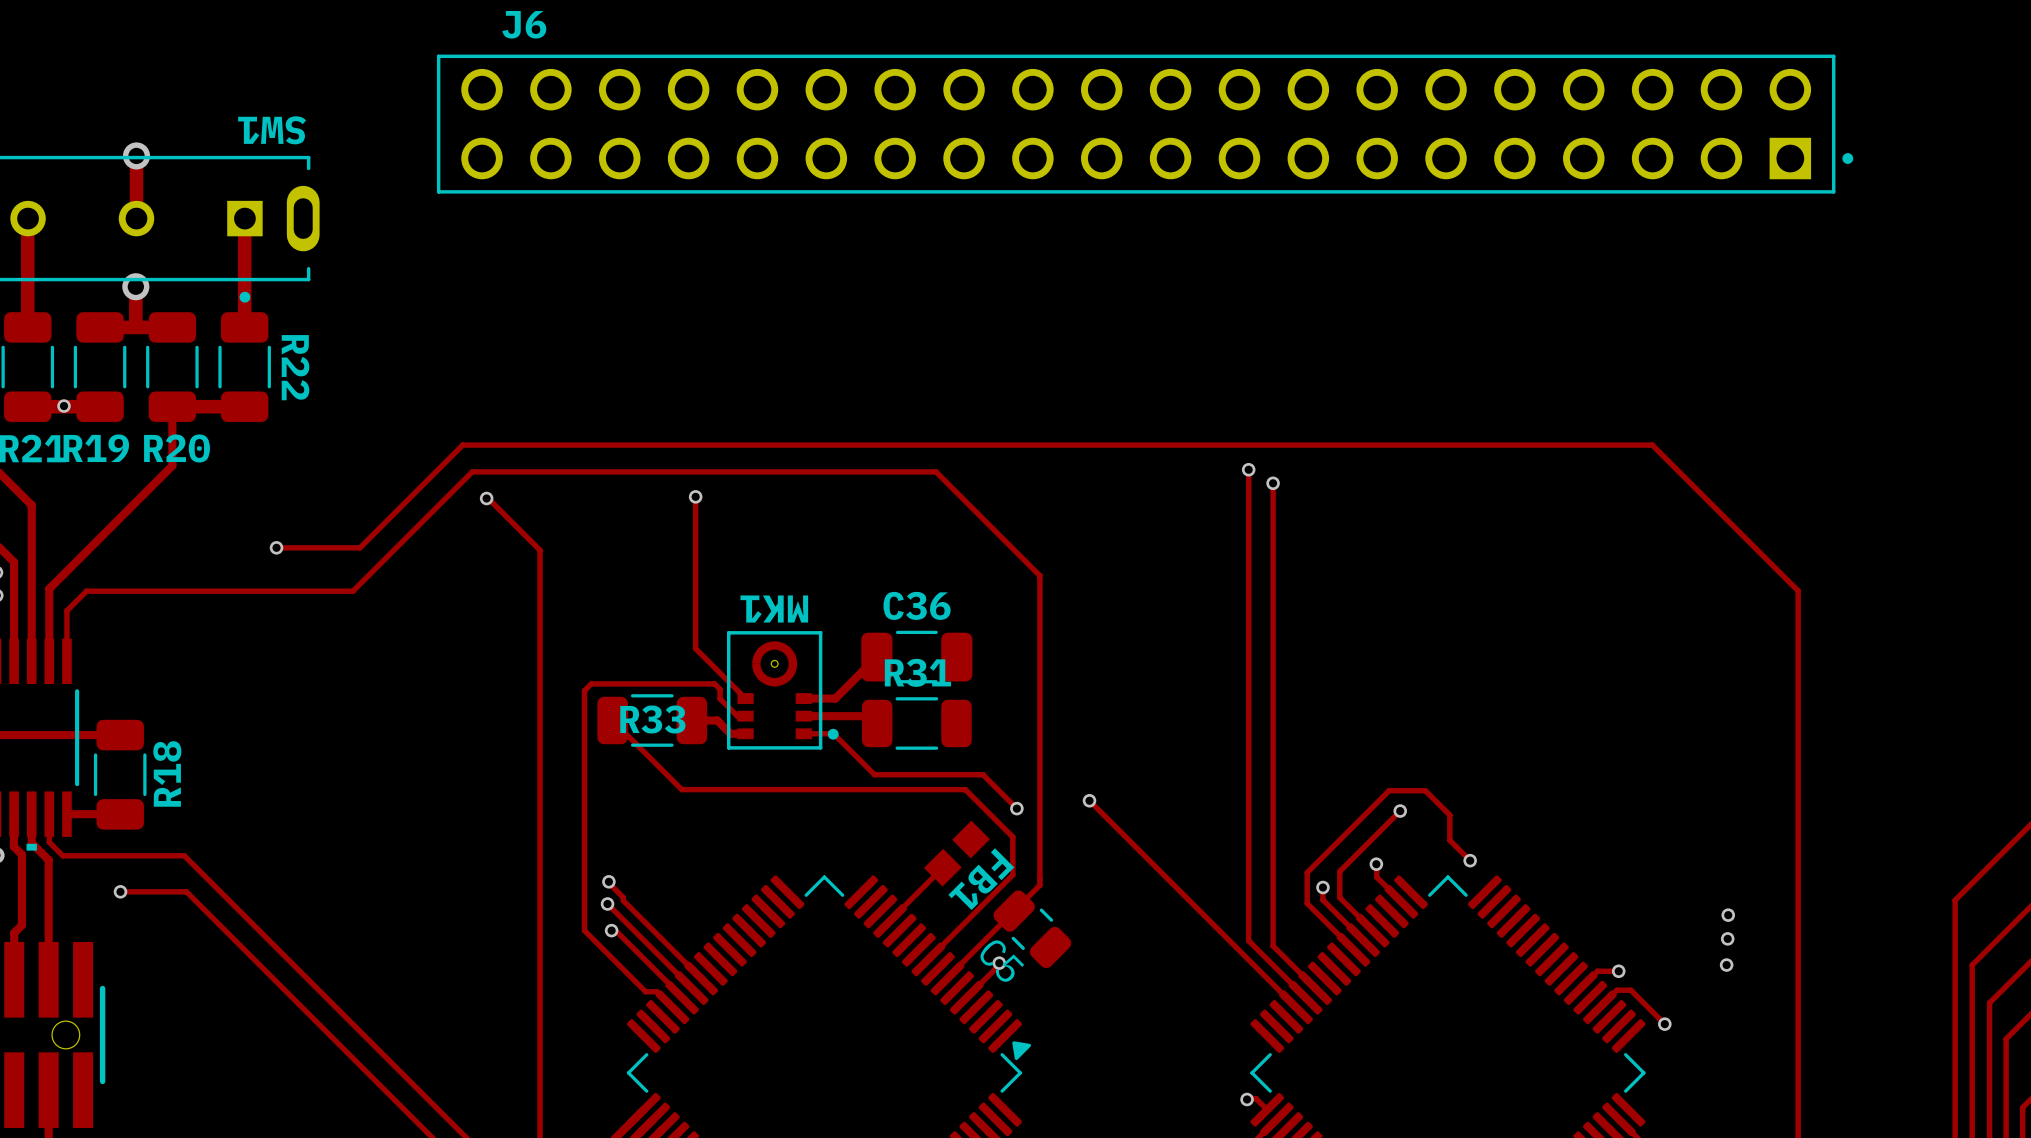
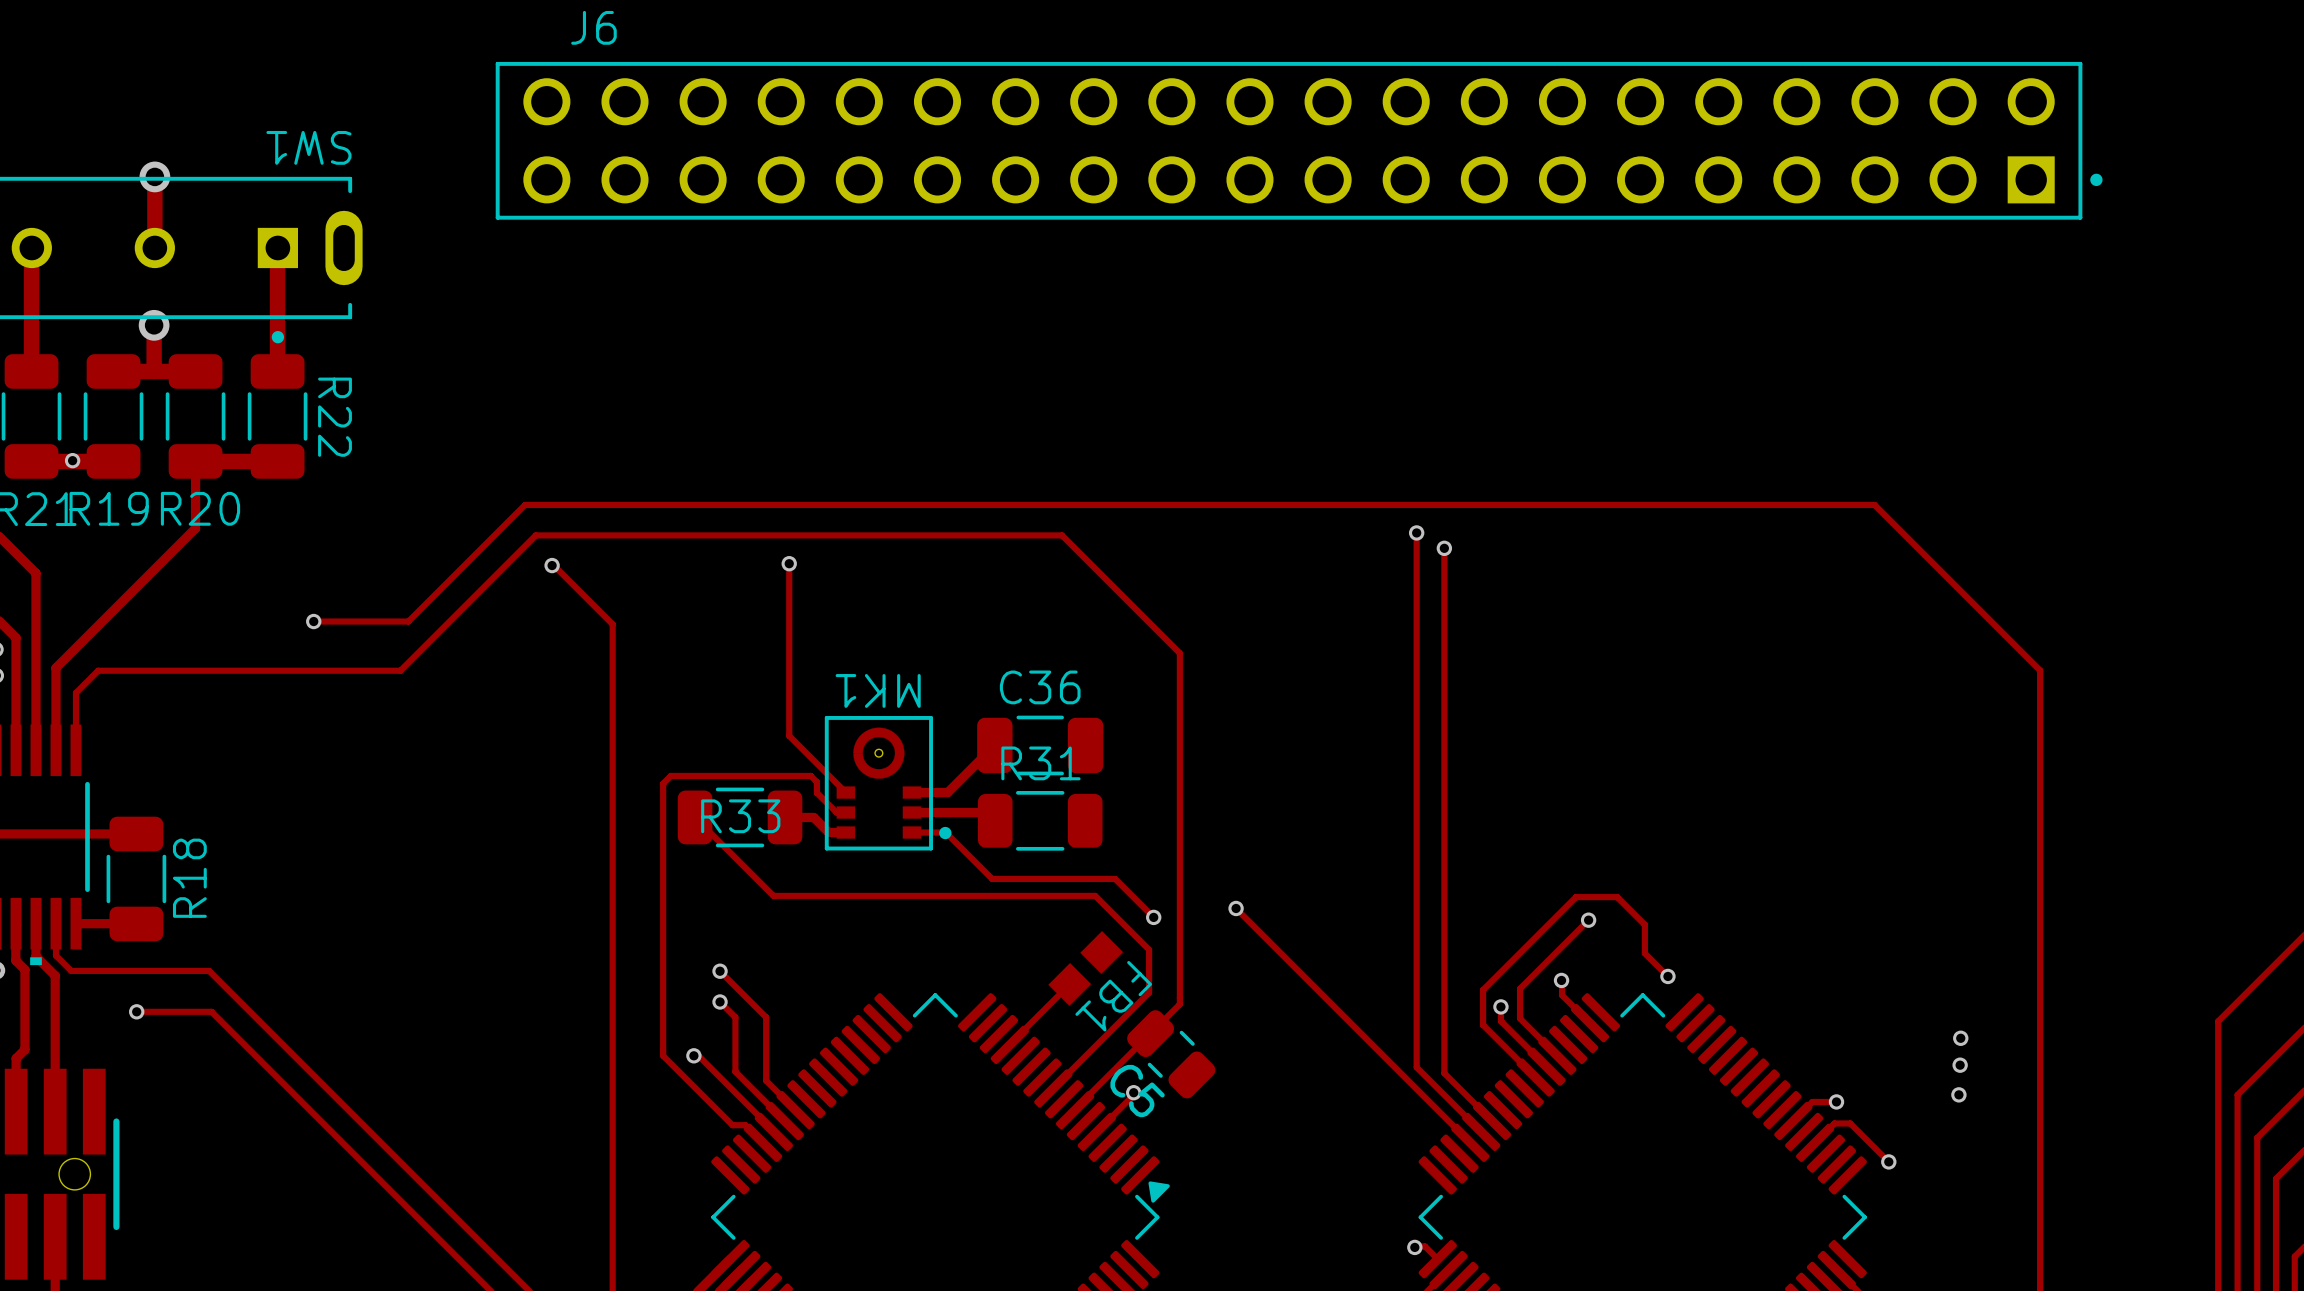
via: none -> (720, 971)
track: (608, 881) (623, 897) (623, 900) (675, 952) -> (720, 971) (766, 1017) (766, 1080)
via: (608, 881) -> none
via: none -> (720, 1001)
track: (607, 903) (648, 944) -> (720, 1001) (735, 1017) (735, 1071)
via: (607, 903) -> none

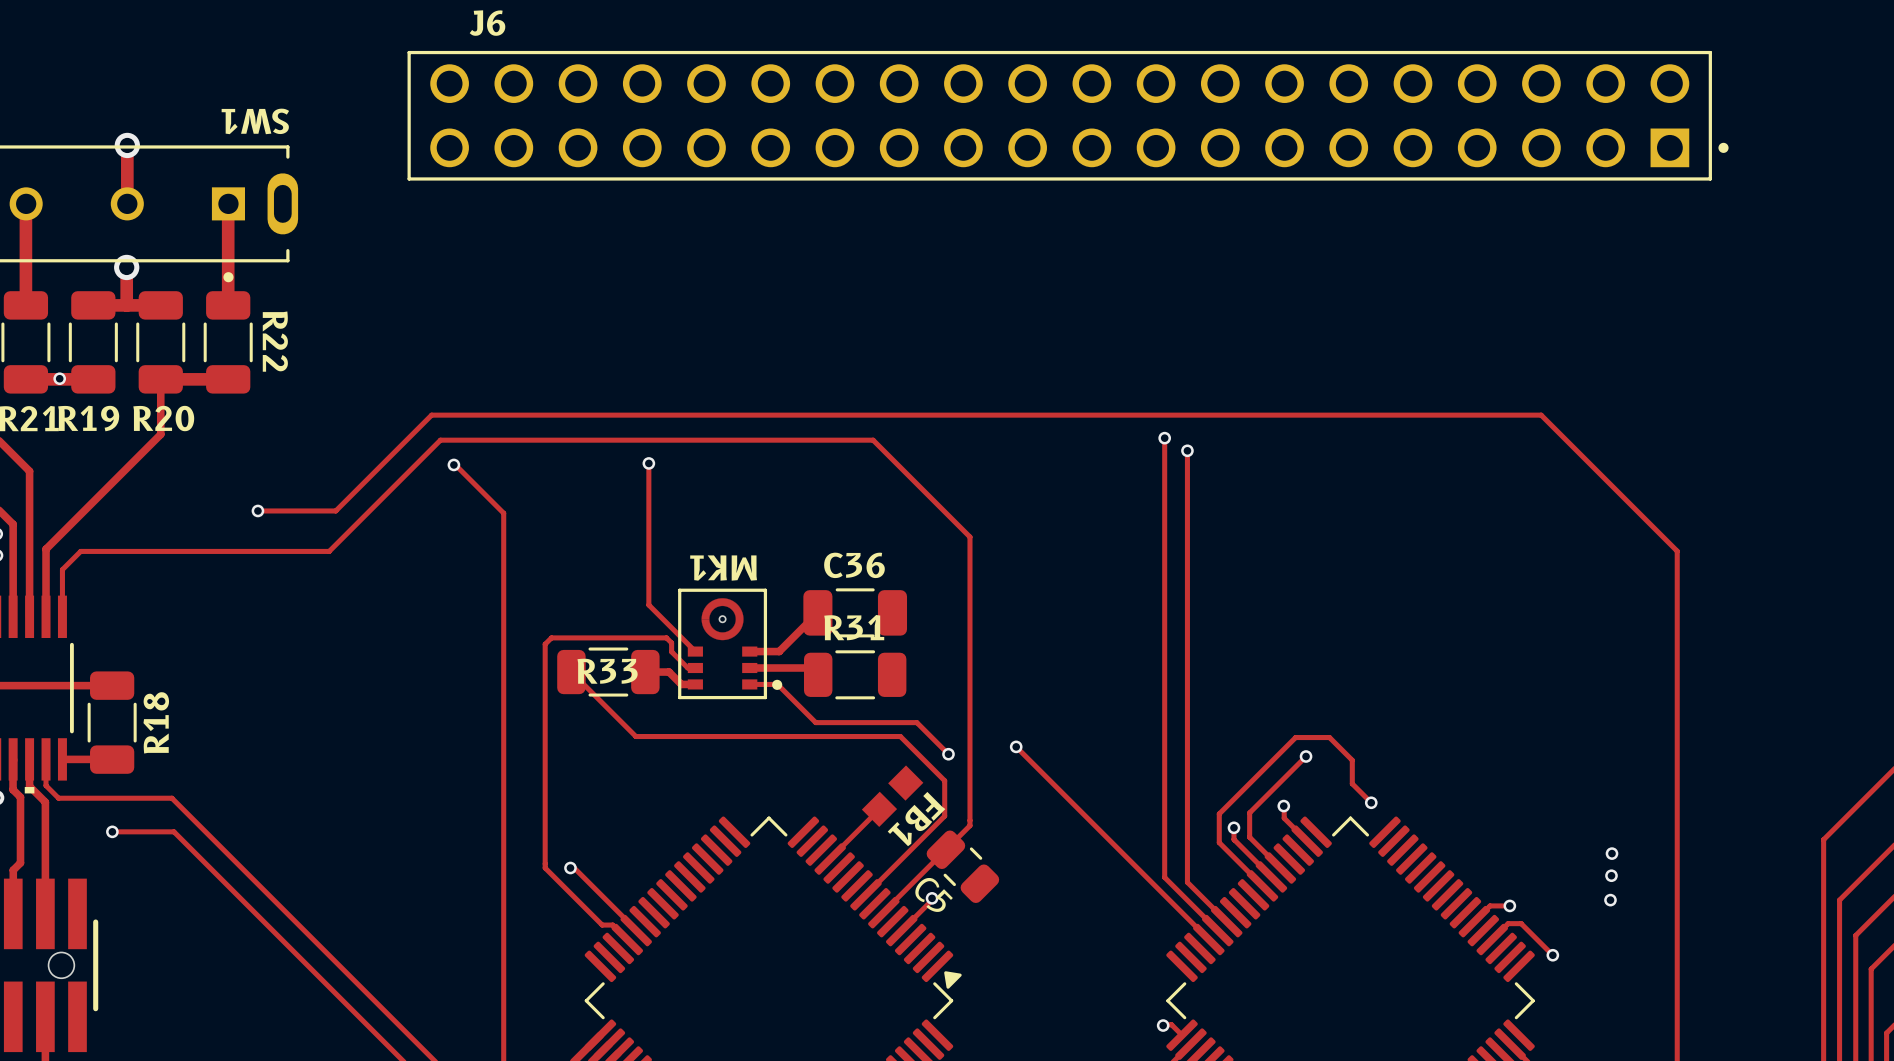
track: (720, 971) (766, 1017) (766, 1080) (795, 1110) -> none
via: (720, 971) -> none
track: (720, 1001) (735, 1017) (735, 1071) (784, 1121) -> none
via: (720, 1001) -> none

